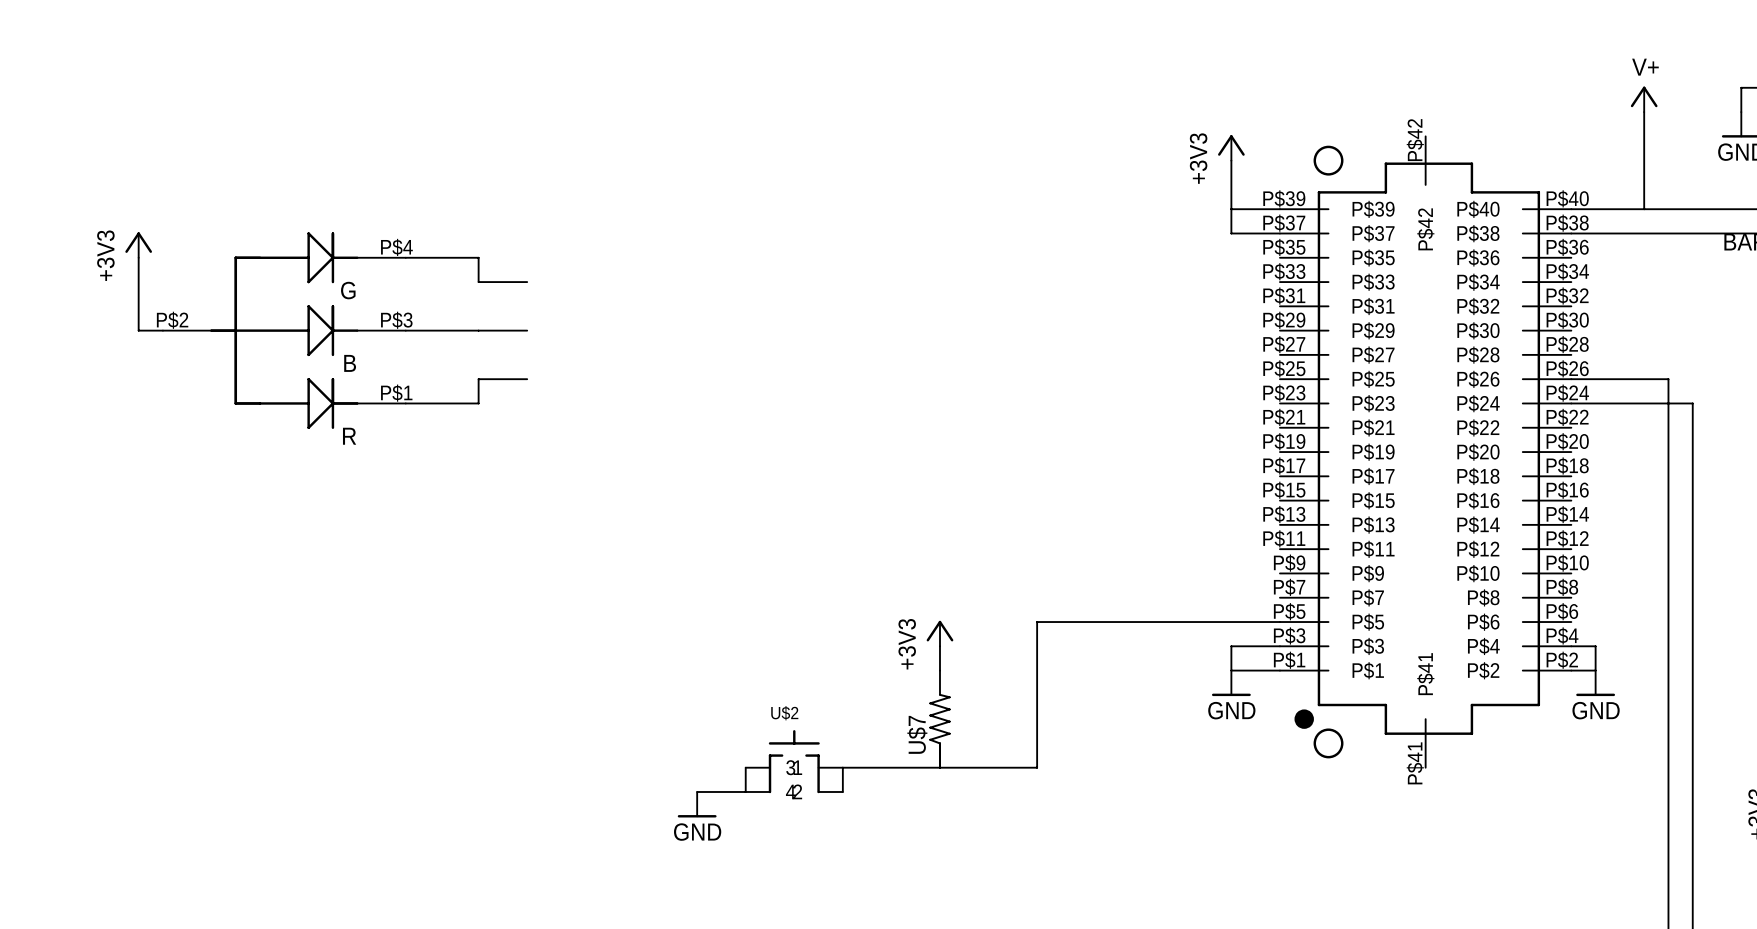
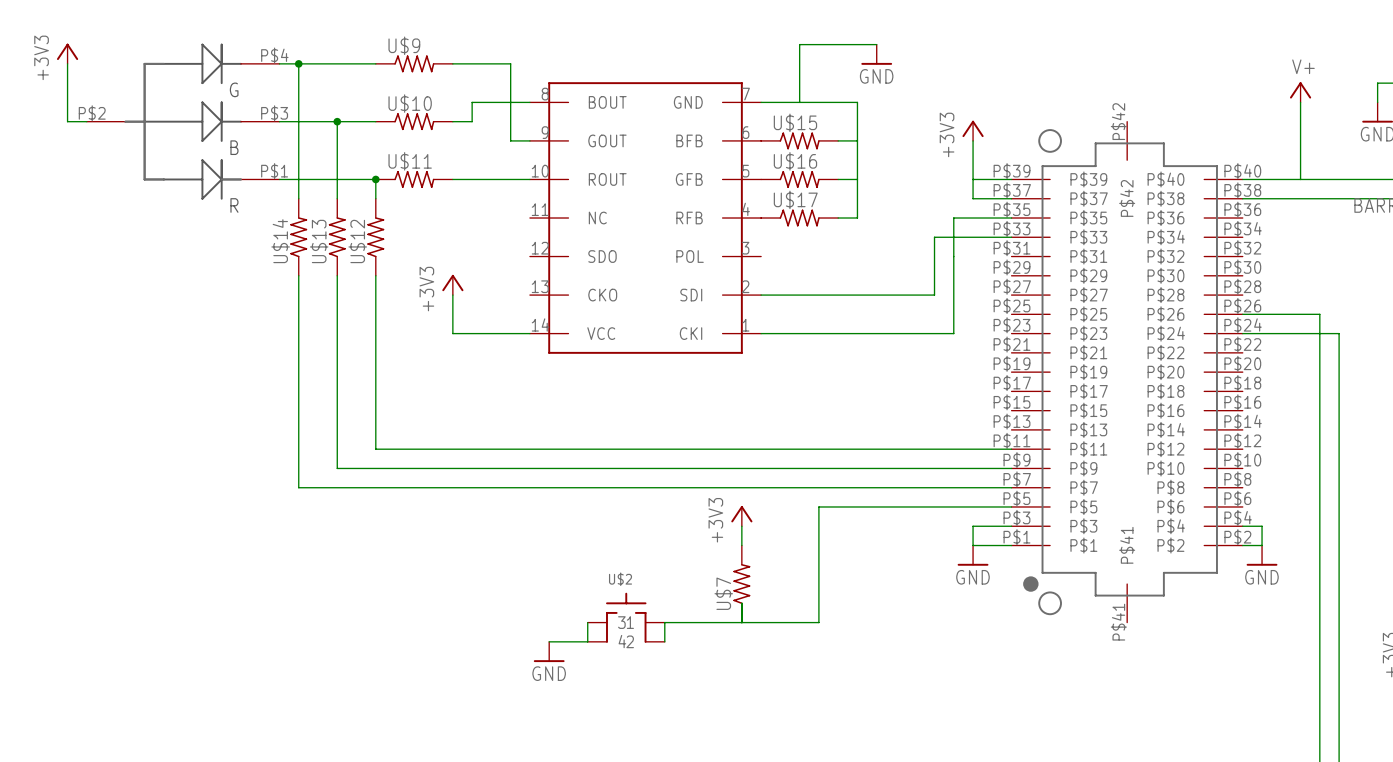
wire: none -> (876, 44) (799, 44) (799, 102)
power symbol: none -> GND (876, 54)
wire: none -> (279, 63) (375, 63)
wire: none -> (298, 63) (298, 198)
junction: none -> (298, 63)
U$9: none -> (414, 63)
wire: none -> (452, 63) (510, 63) (510, 140) (529, 140)
wire: none -> (529, 102) (472, 102) (472, 121) (452, 121)
wire: none -> (761, 102) (857, 102) (857, 218) (838, 218)
wire: none -> (337, 121) (337, 198)
junction: none -> (337, 121)
U$10: none -> (414, 121)
U$15: none -> (799, 140)
wire: none -> (838, 140) (857, 140)
wire: none -> (279, 179) (375, 179) (375, 198)
junction: none -> (375, 179)
U$11: none -> (414, 179)
wire: none -> (452, 179) (529, 179)
U$16: none -> (799, 179)
wire: none -> (838, 179) (857, 179)
power symbol position: +3V3 (138, 245) -> +3V3 (67, 53)
wire: (138, 257) (138, 330) (162, 330) -> (67, 63) (67, 121) (86, 121)
wire: (405, 257) (478, 257) (478, 282) (527, 282) -> none
part: none -> (645, 218)
U$17: none -> (799, 218)
wire: none -> (1011, 218) (953, 218) (953, 333) (761, 333)
U$14: none -> (298, 237)
U$13: none -> (337, 237)
U$12: none -> (375, 237)
wire: none -> (1011, 237) (934, 237) (934, 295) (761, 295)
part position: (284, 330) -> (183, 121)
wire: none -> (298, 275) (298, 487) (1011, 487)
wire: (405, 330) (527, 330) -> (279, 121) (375, 121)
wire: none -> (337, 275) (337, 468) (1011, 468)
power symbol: none -> +3V3 (452, 284)
wire: none -> (452, 295) (452, 333) (529, 333)
wire: (478, 379) (527, 379) -> (375, 314) (375, 275)
wire: (405, 403) (478, 403) -> (1011, 449) (375, 449) (375, 333)

